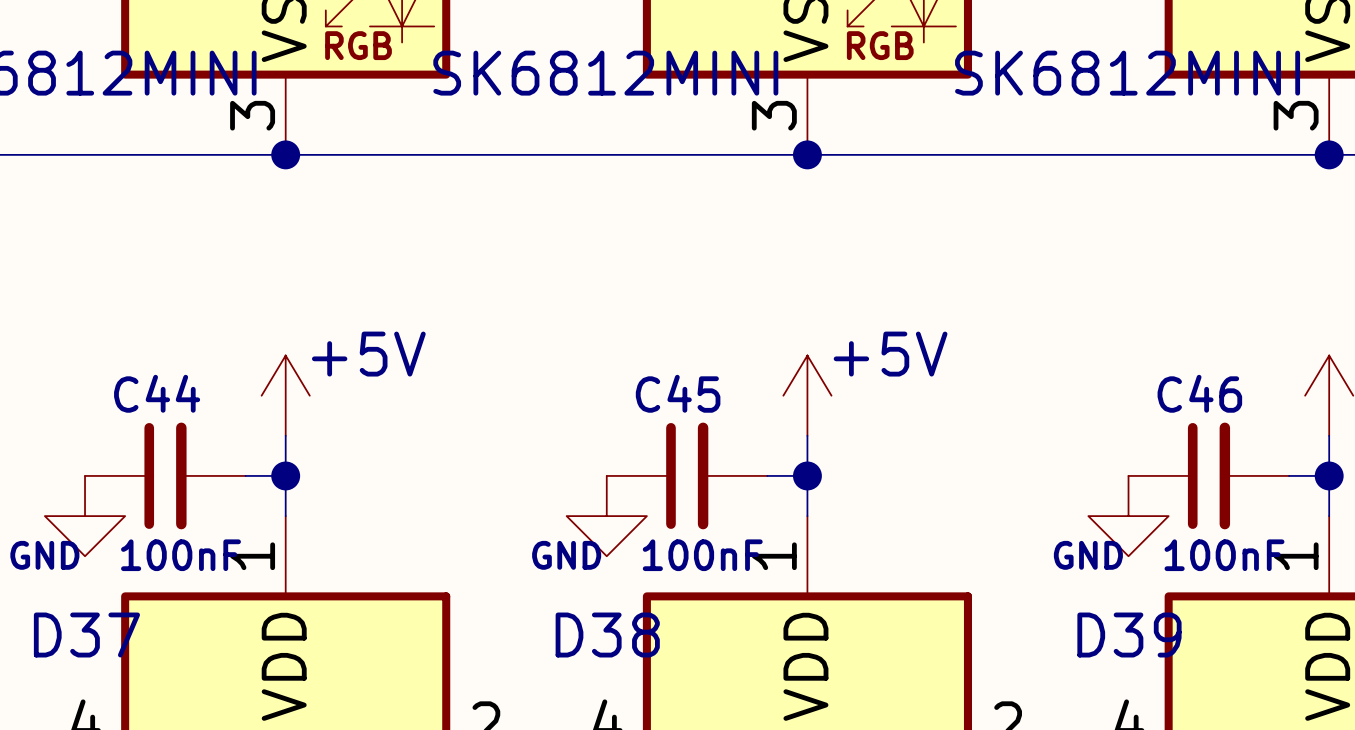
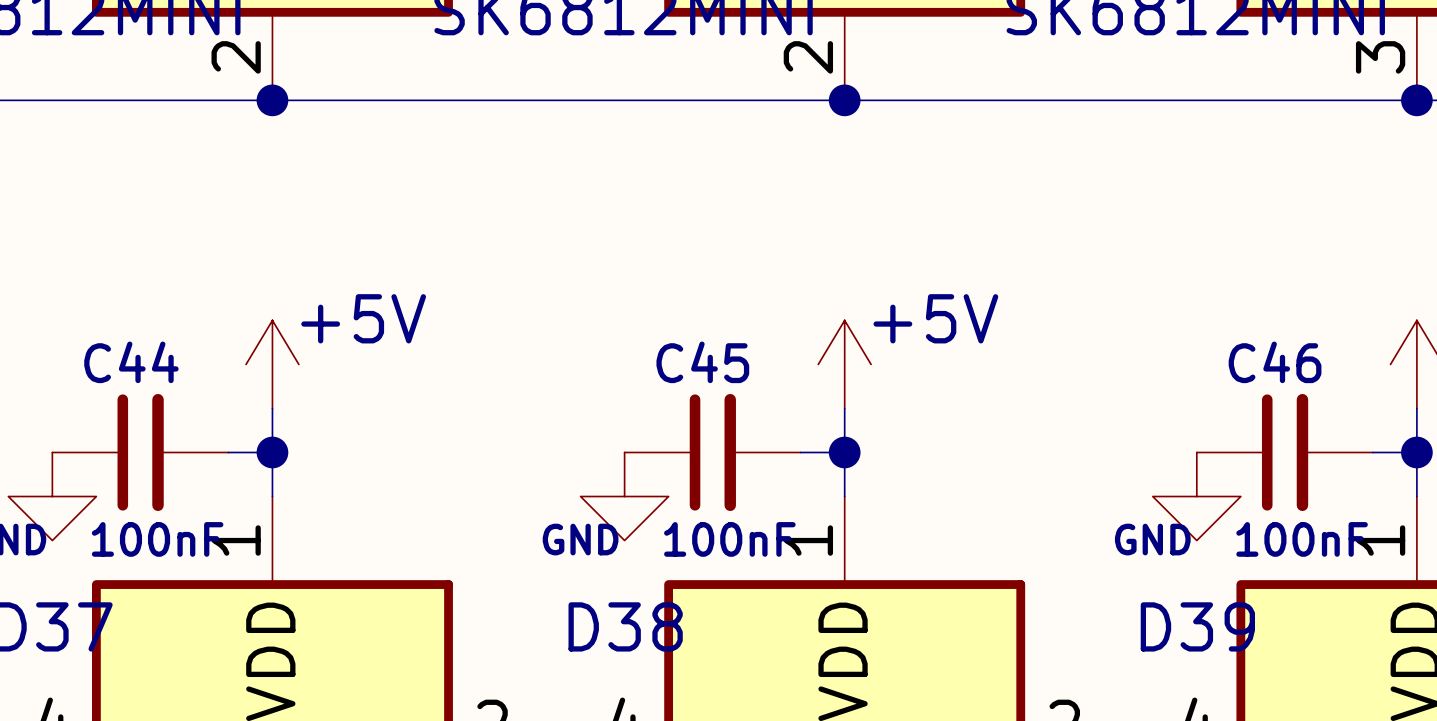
part pin number: 3 (252, 115) -> 2 (236, 57)
part pin number: 3 (774, 115) -> 2 (808, 57)

